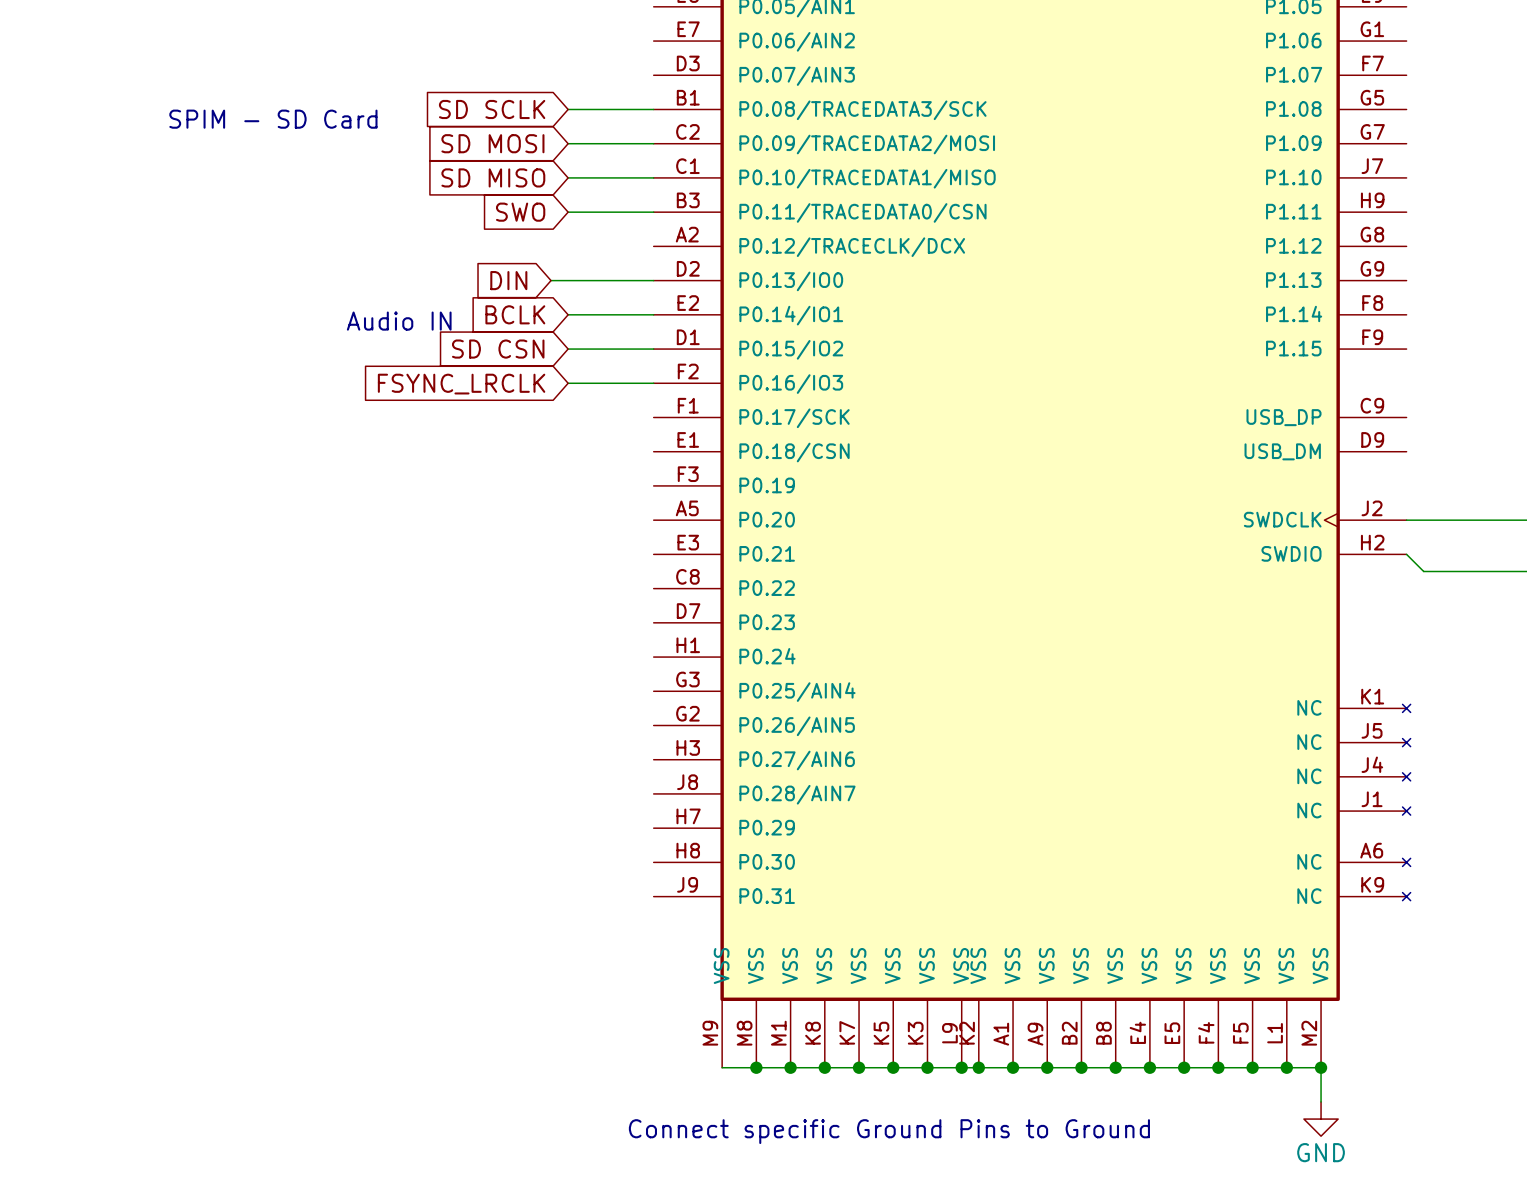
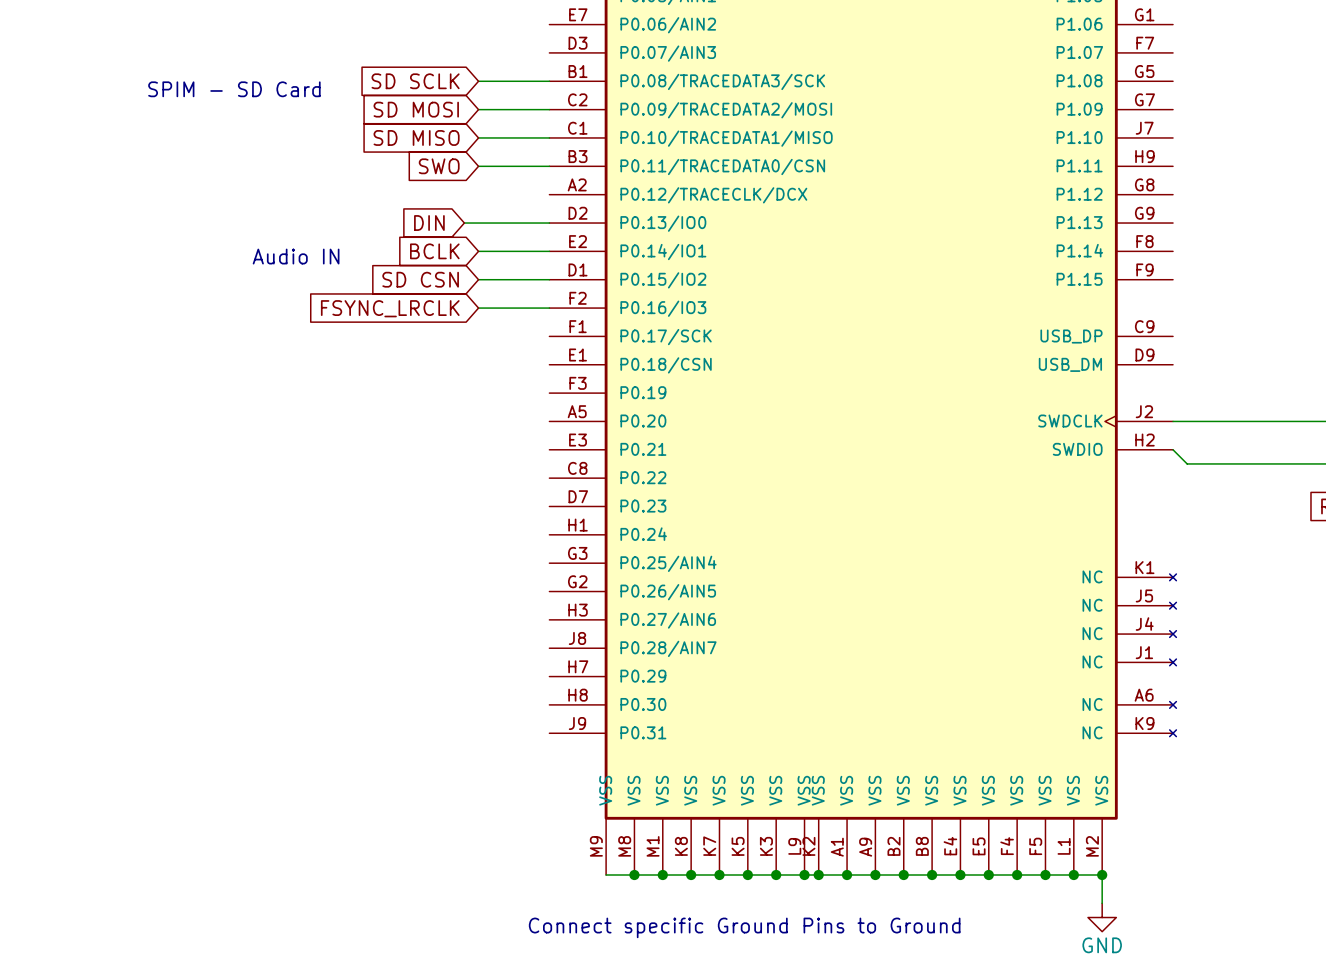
text position: Audio IN (399, 321) -> Audio IN (296, 256)

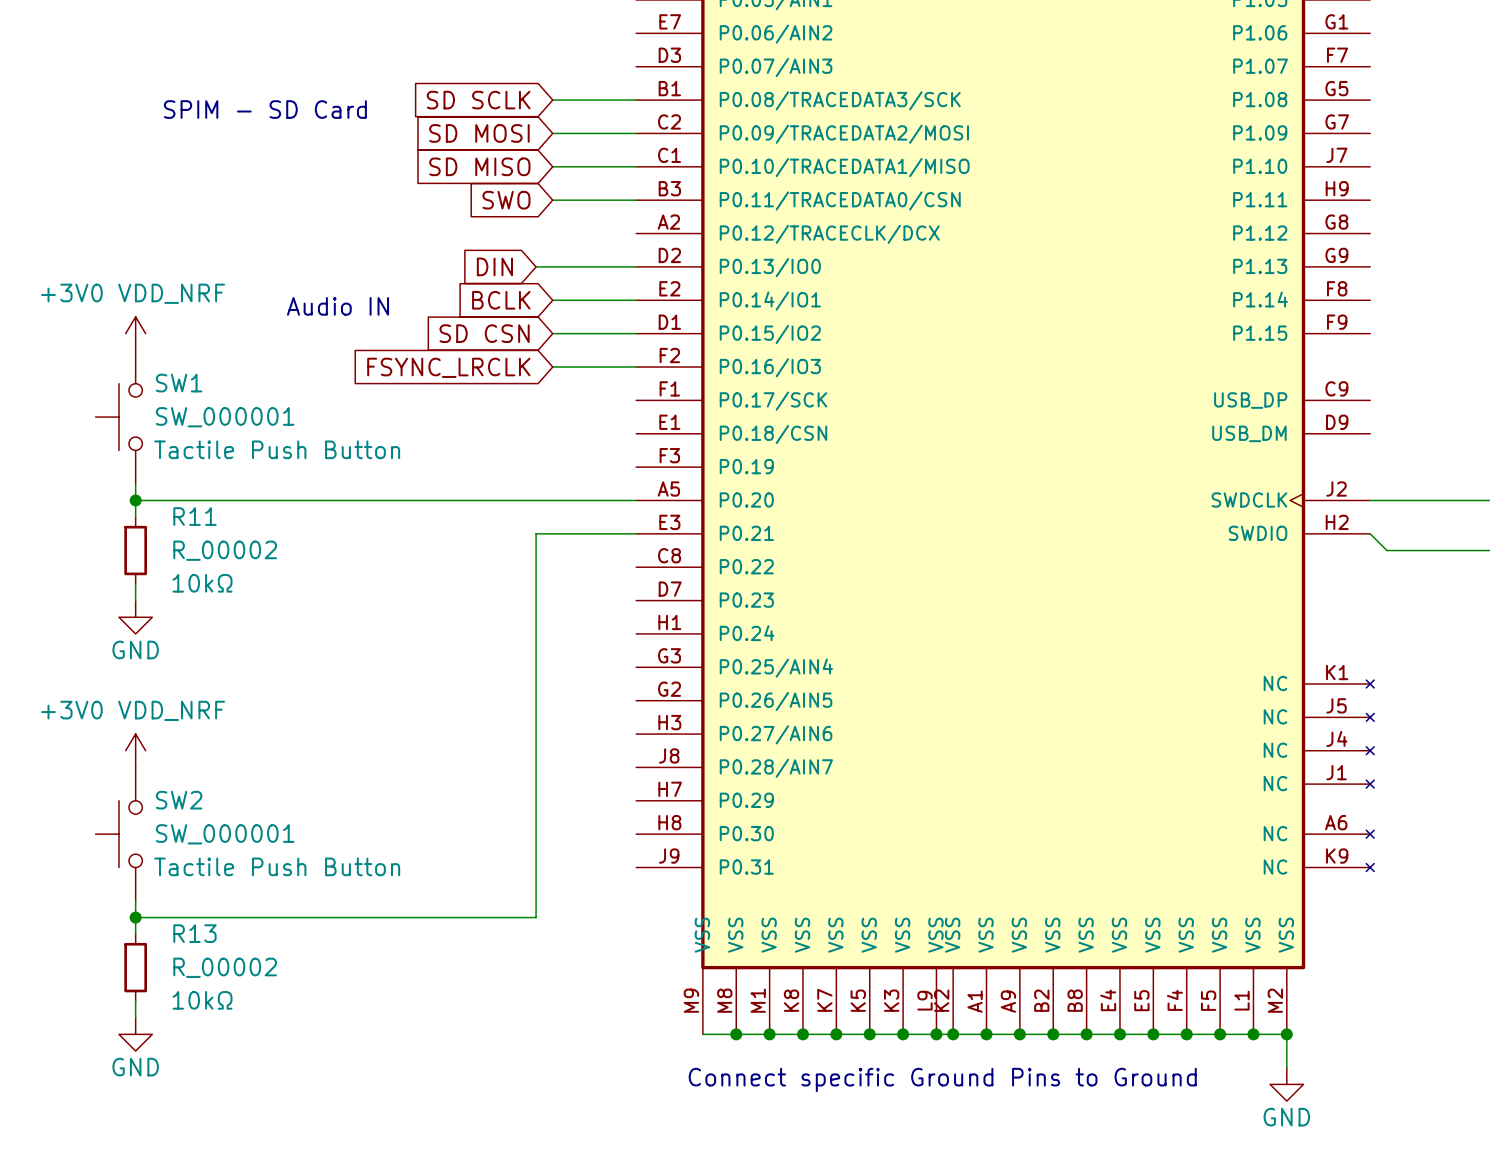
power symbol: none -> +3V0 VDD_NRF (135, 333)
SW1: none -> SW_000001 (118, 417)
wire: none -> (135, 483) (135, 517)
wire: none -> (135, 500) (636, 500)
junction: none -> (135, 500)
wire: none -> (636, 533) (536, 533) (536, 917) (135, 917)
R11: none -> R_00002 (135, 550)
wire: none -> (135, 583) (135, 600)
power symbol: none -> GND (135, 617)
power symbol: none -> +3V0 VDD_NRF (135, 750)
SW2: none -> SW_000001 (118, 834)
wire: none -> (135, 900) (135, 934)
junction: none -> (135, 917)
R13: none -> R_00002 (135, 967)
wire: none -> (135, 1000) (135, 1017)
power symbol: none -> GND (135, 1034)
text position: Connect specific Ground Pins to Ground (744, 927) -> Connect specific Ground Pins to Ground (942, 1079)

